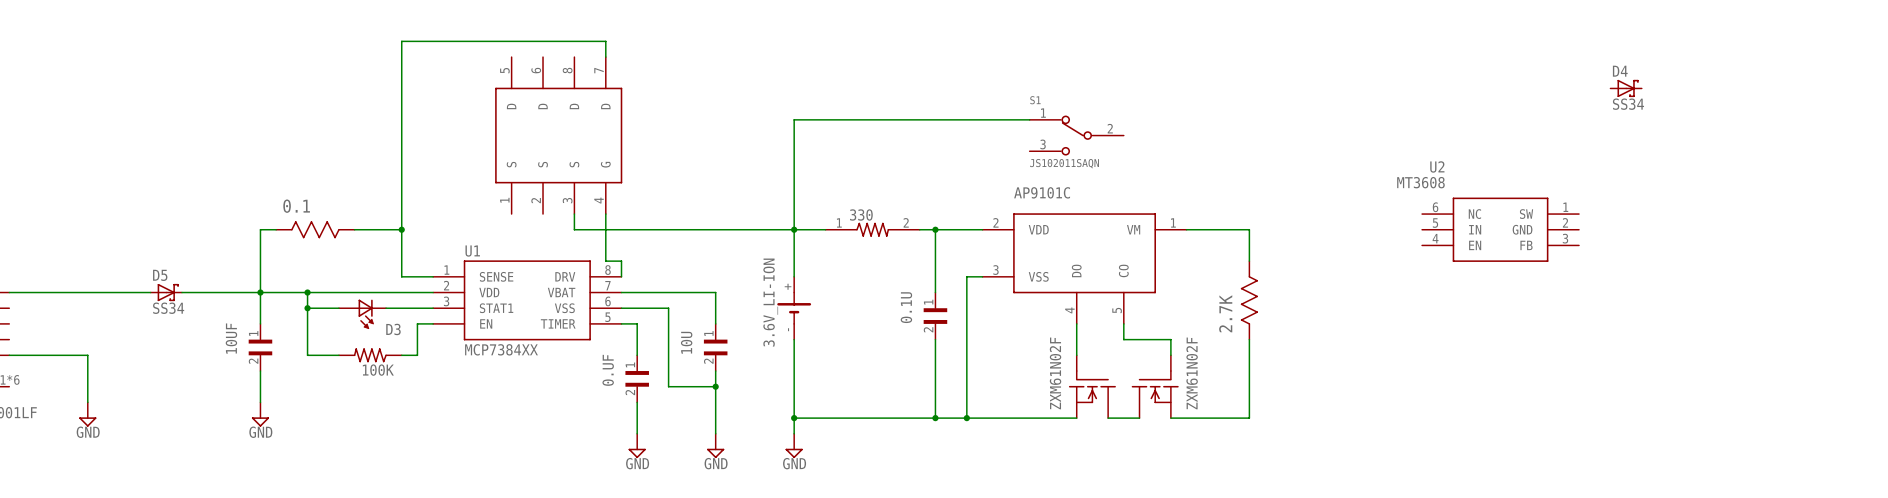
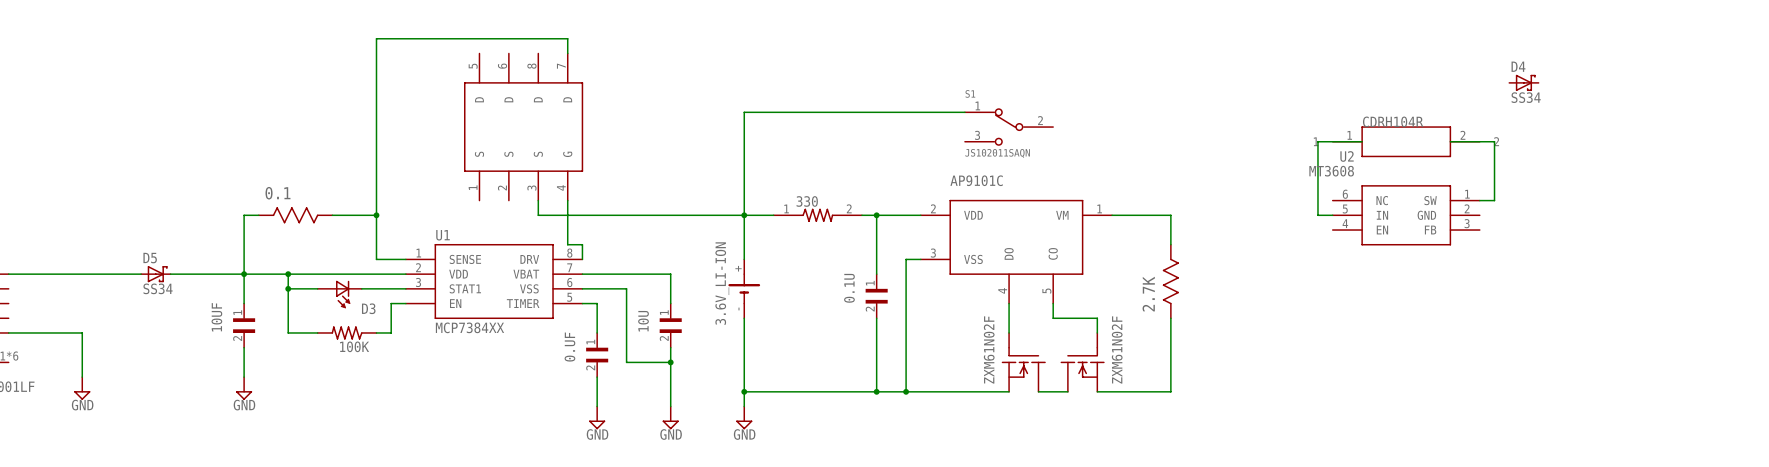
wire: none -> (1362, 141) (1317, 141) (1317, 215) (1332, 215)
part: none -> (1406, 141)
wire: none -> (1450, 141) (1494, 141) (1494, 200) (1479, 200)

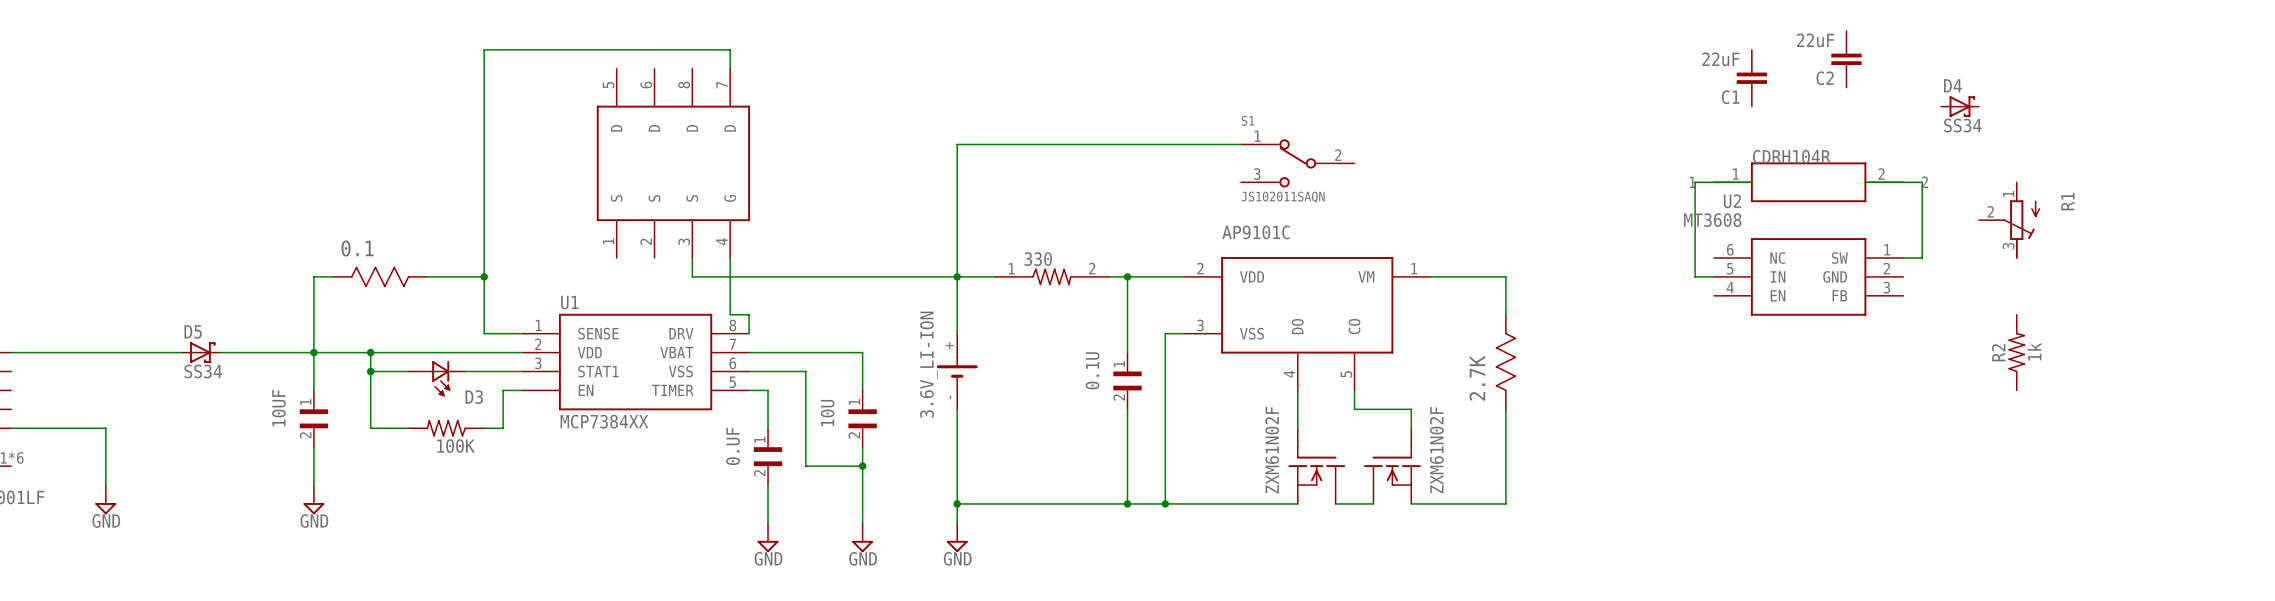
C2: none -> 22uF (1846, 59)
C1: none -> 22uF (1751, 78)
R1: none -> (2009, 220)
R2: none -> 1k (2016, 352)

